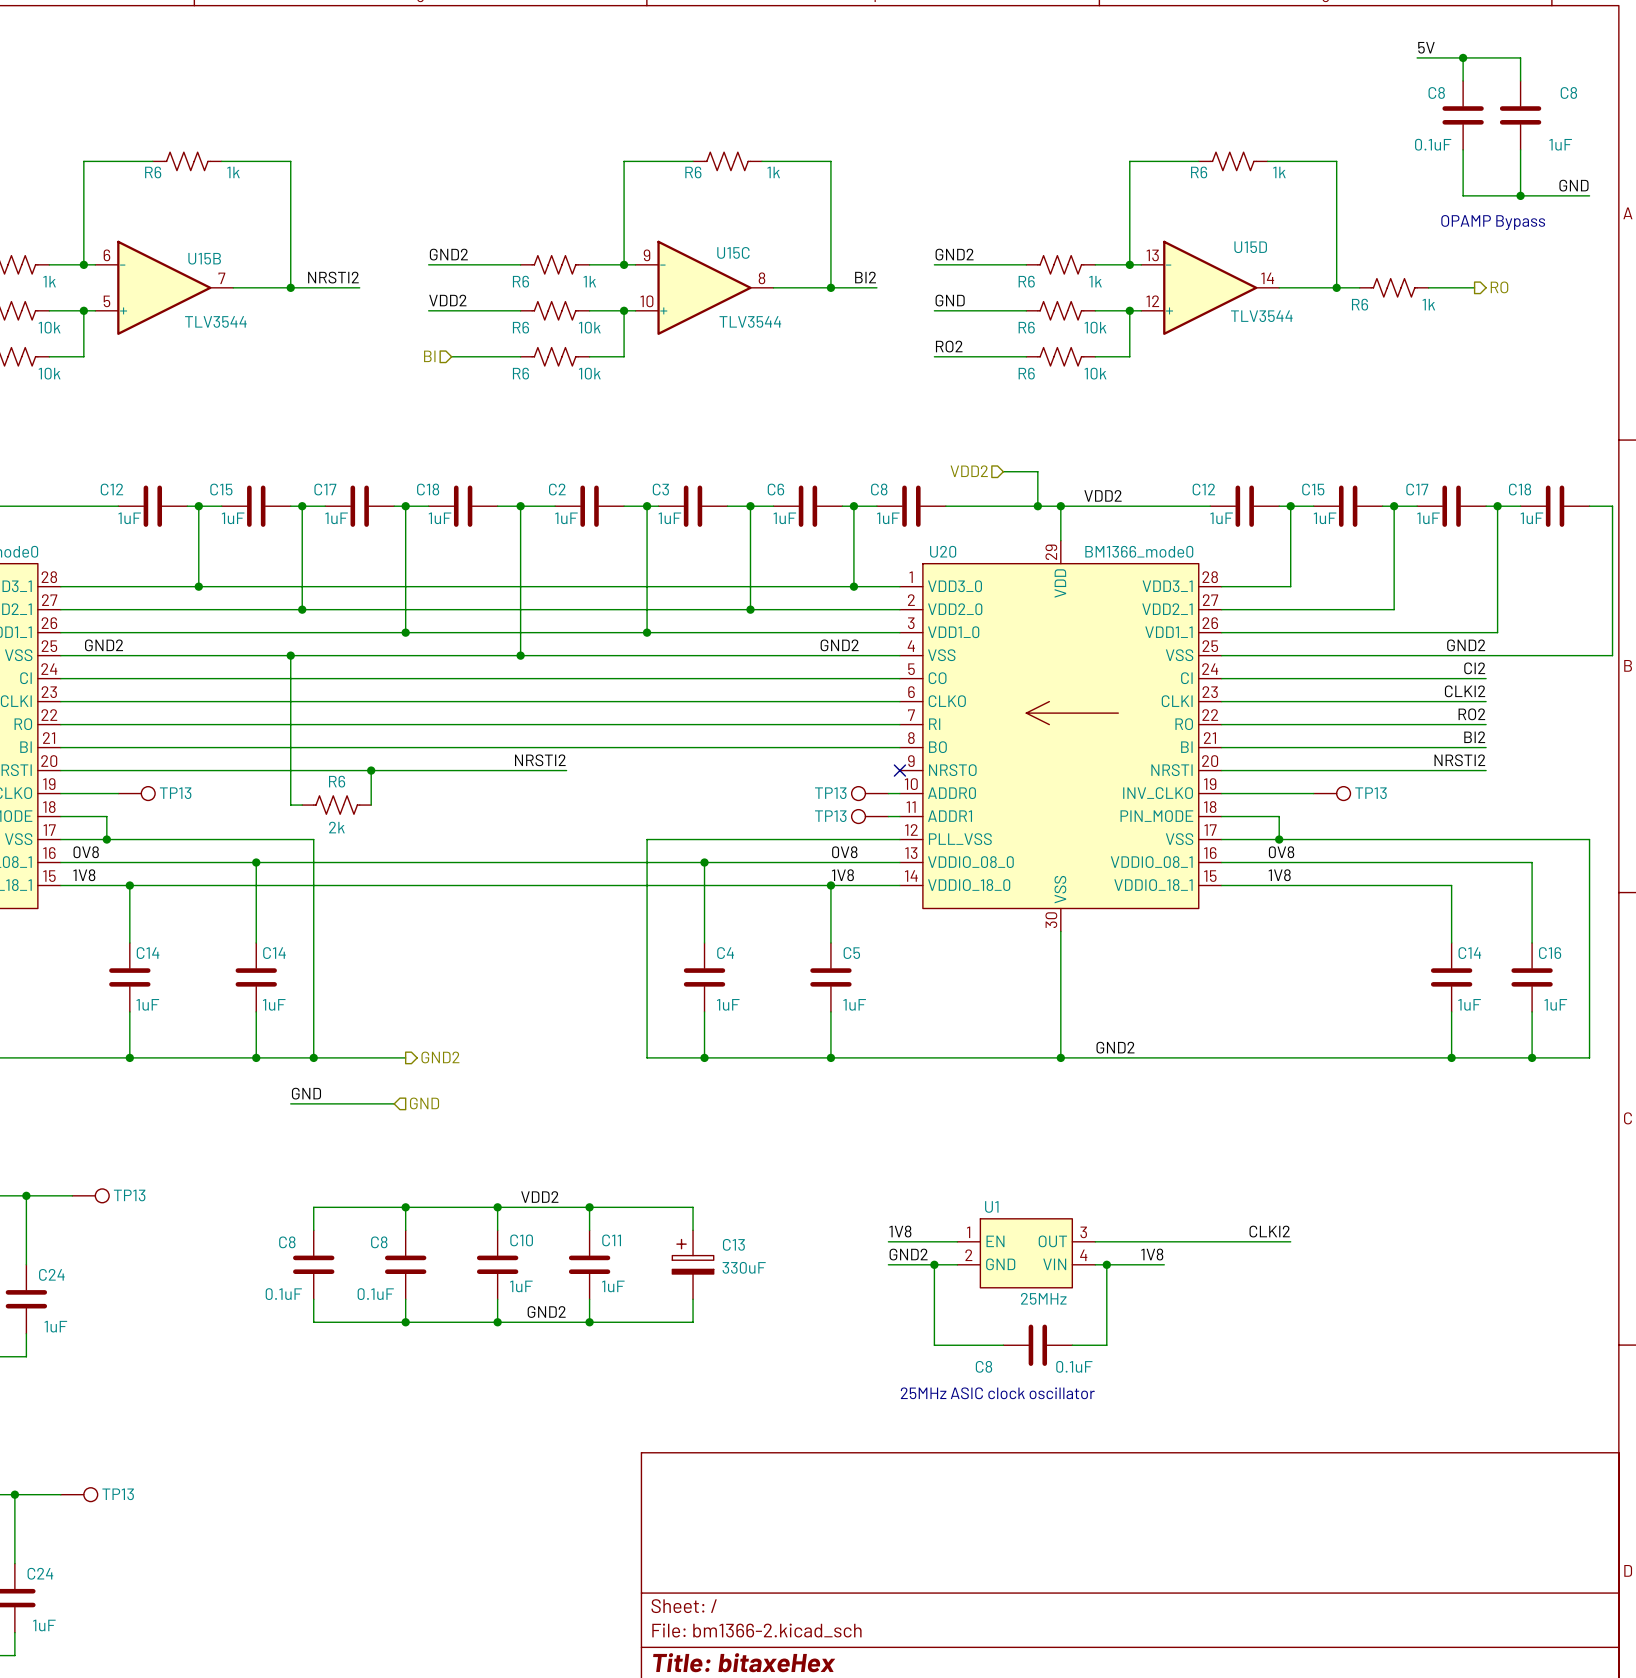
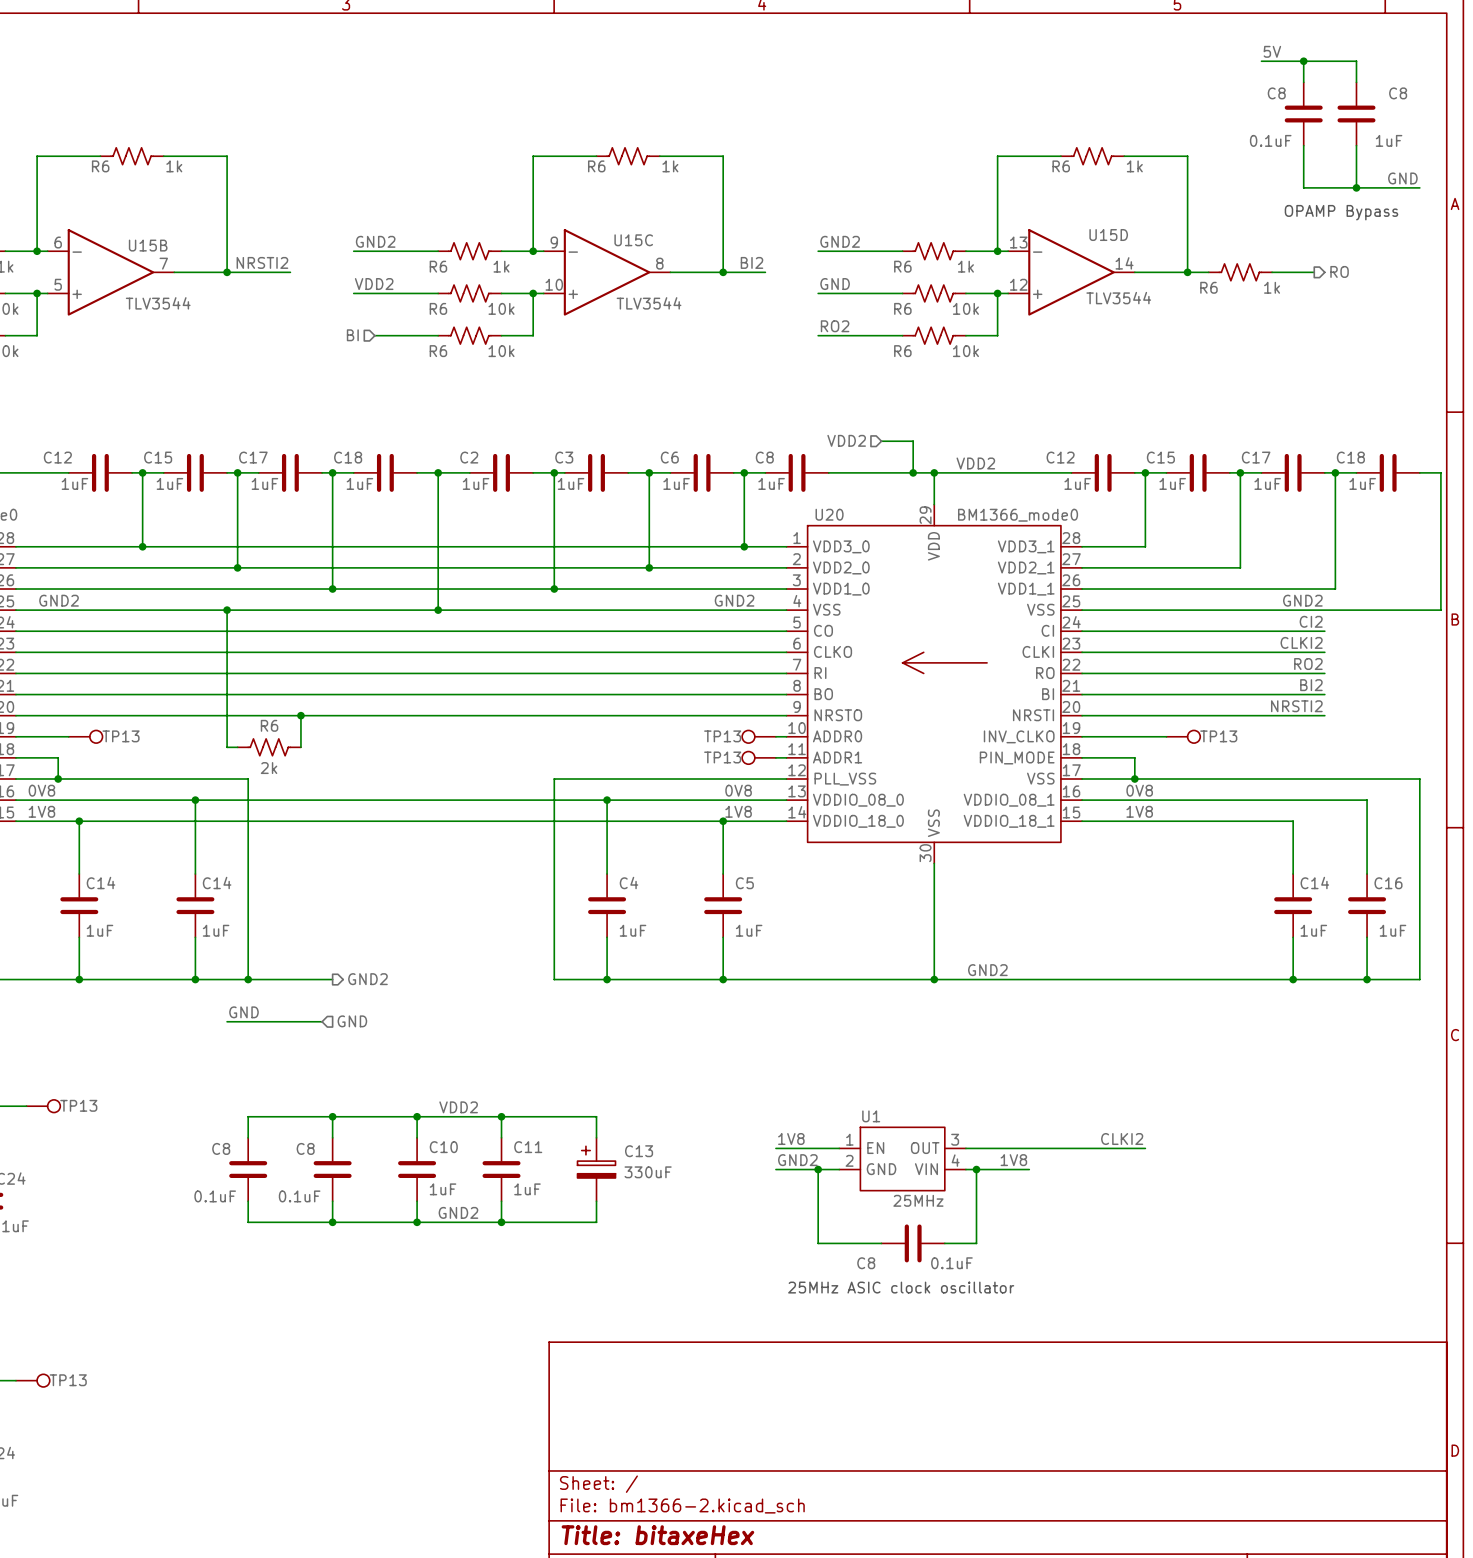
label: NRSTI2 (540, 760) -> none
wire: none -> (480, 715) (786, 715)
no-connect mark: (899, 770) -> none

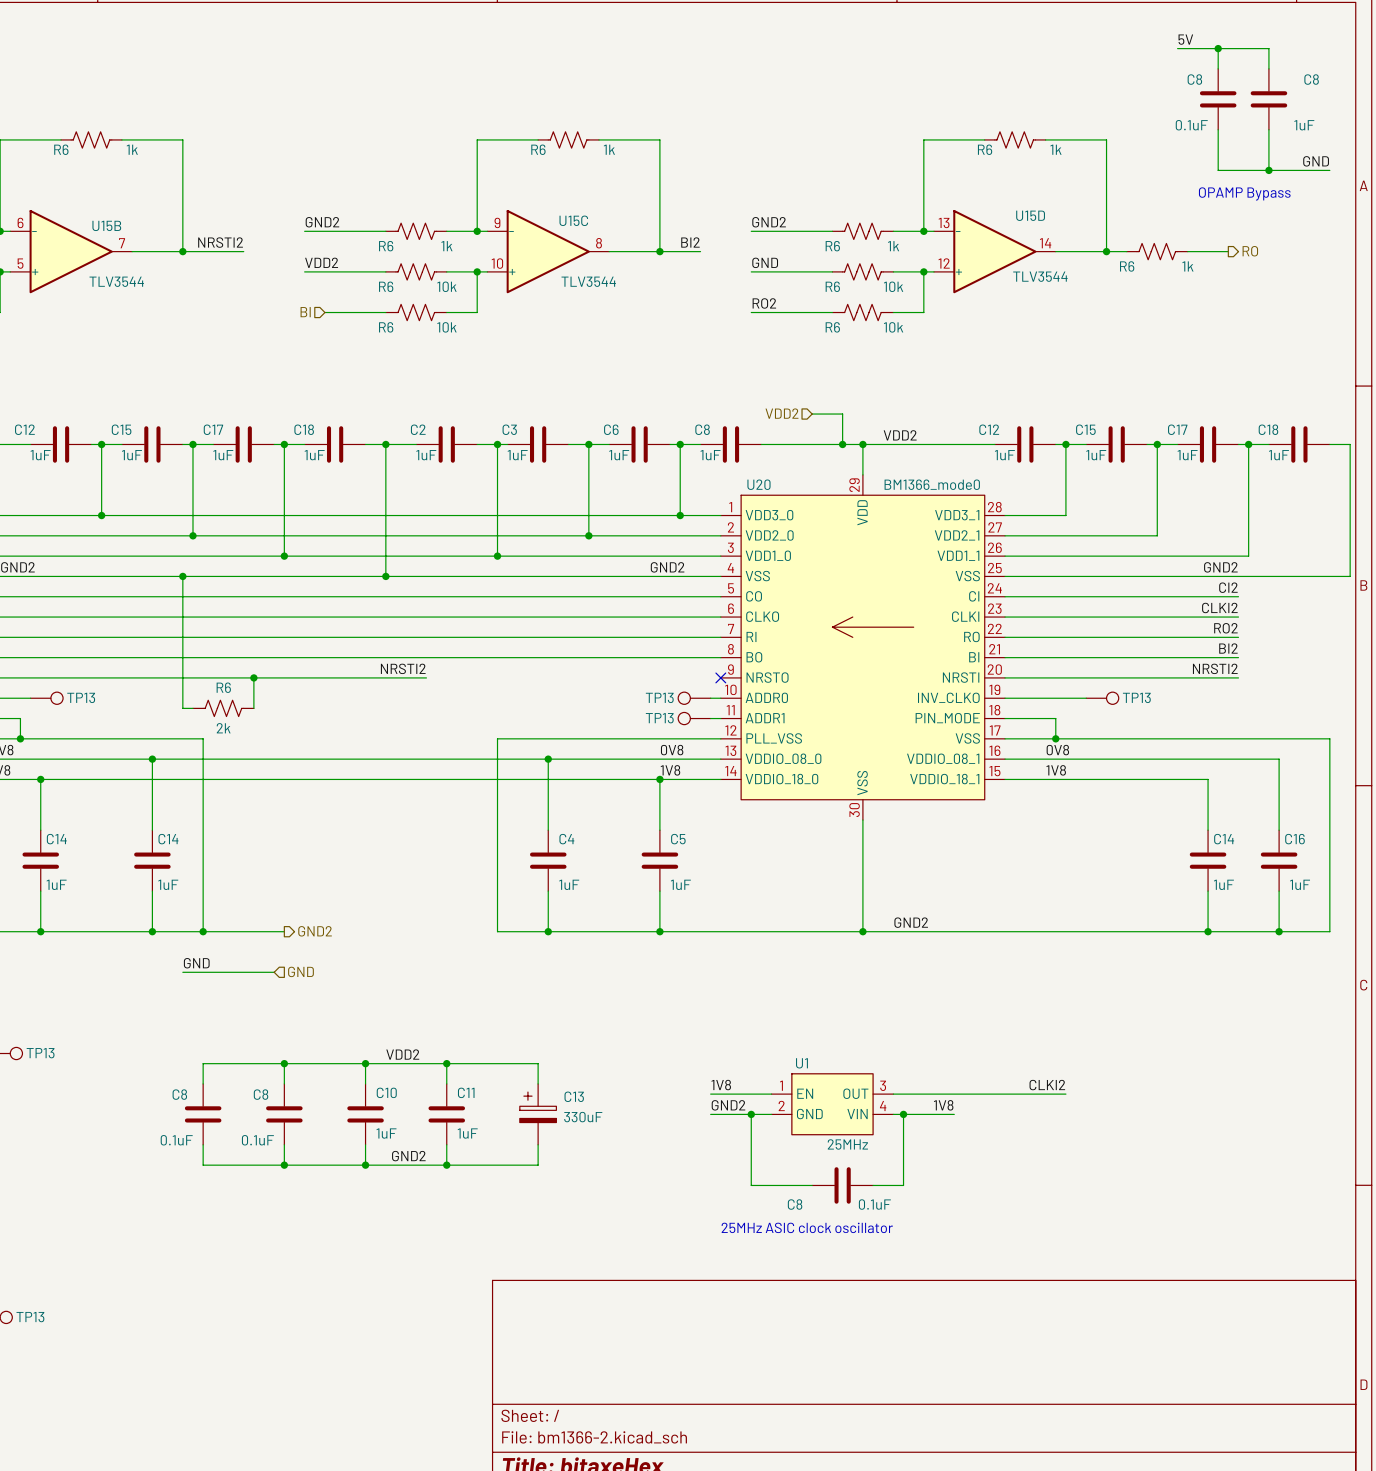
label: none -> NRSTI2 (403, 668)
wire: (480, 715) (786, 715) -> none
no-connect mark: none -> (720, 677)

